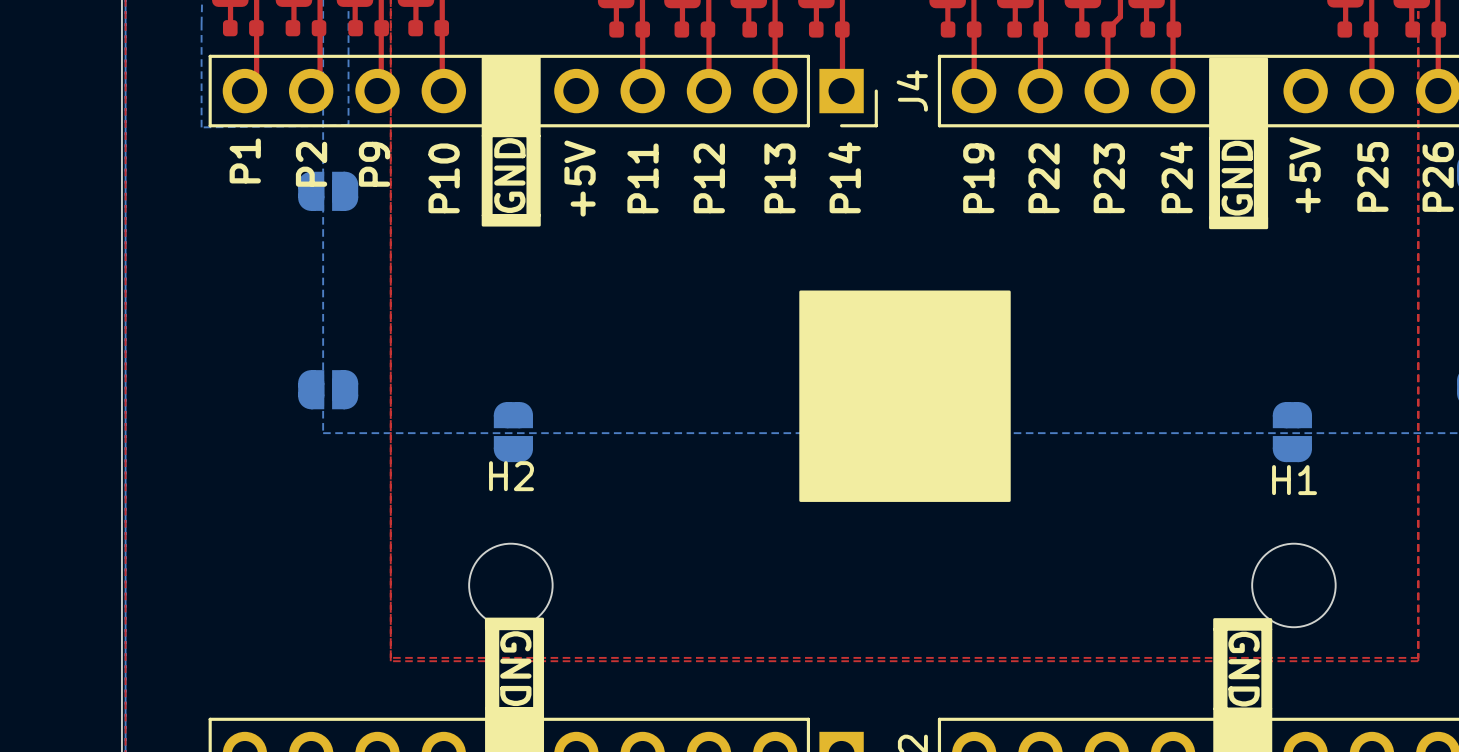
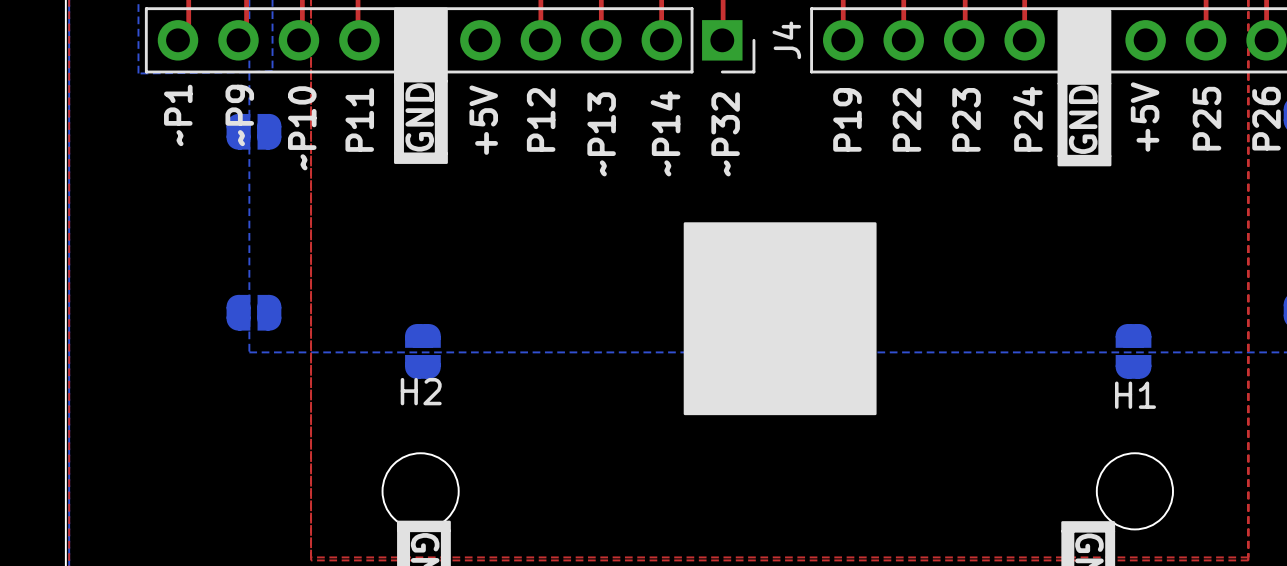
text: P1 (245, 160) -> ~P1 (178, 115)
text: P2 (311, 164) -> ~P9 (239, 115)
text: P9 (374, 164) -> none
text: P14 (844, 177) -> ~P32 (725, 134)
text: P10 (444, 178) -> P11 (359, 119)
text: P11 (643, 178) -> P12 (541, 119)
text: P12 (709, 178) -> ~P13 (601, 134)
text: P13 (779, 178) -> ~P14 (665, 133)
text: none -> ~P10 (302, 128)

